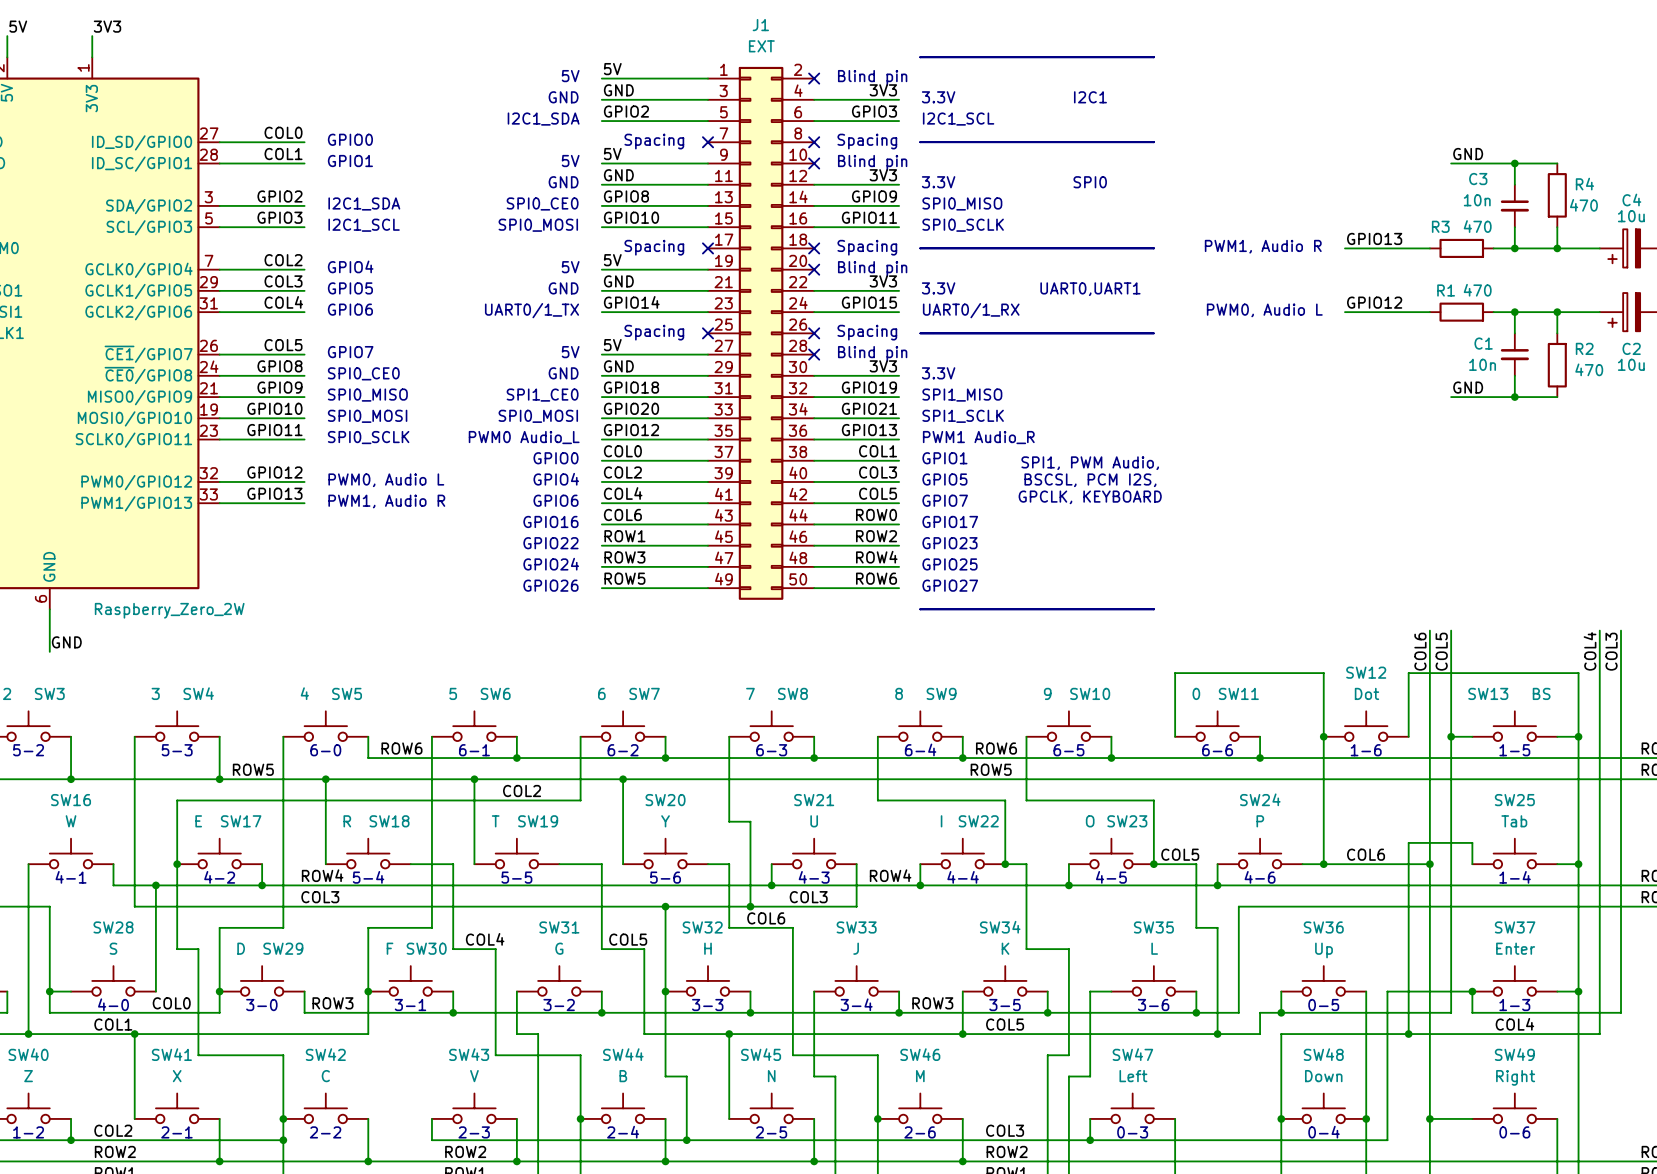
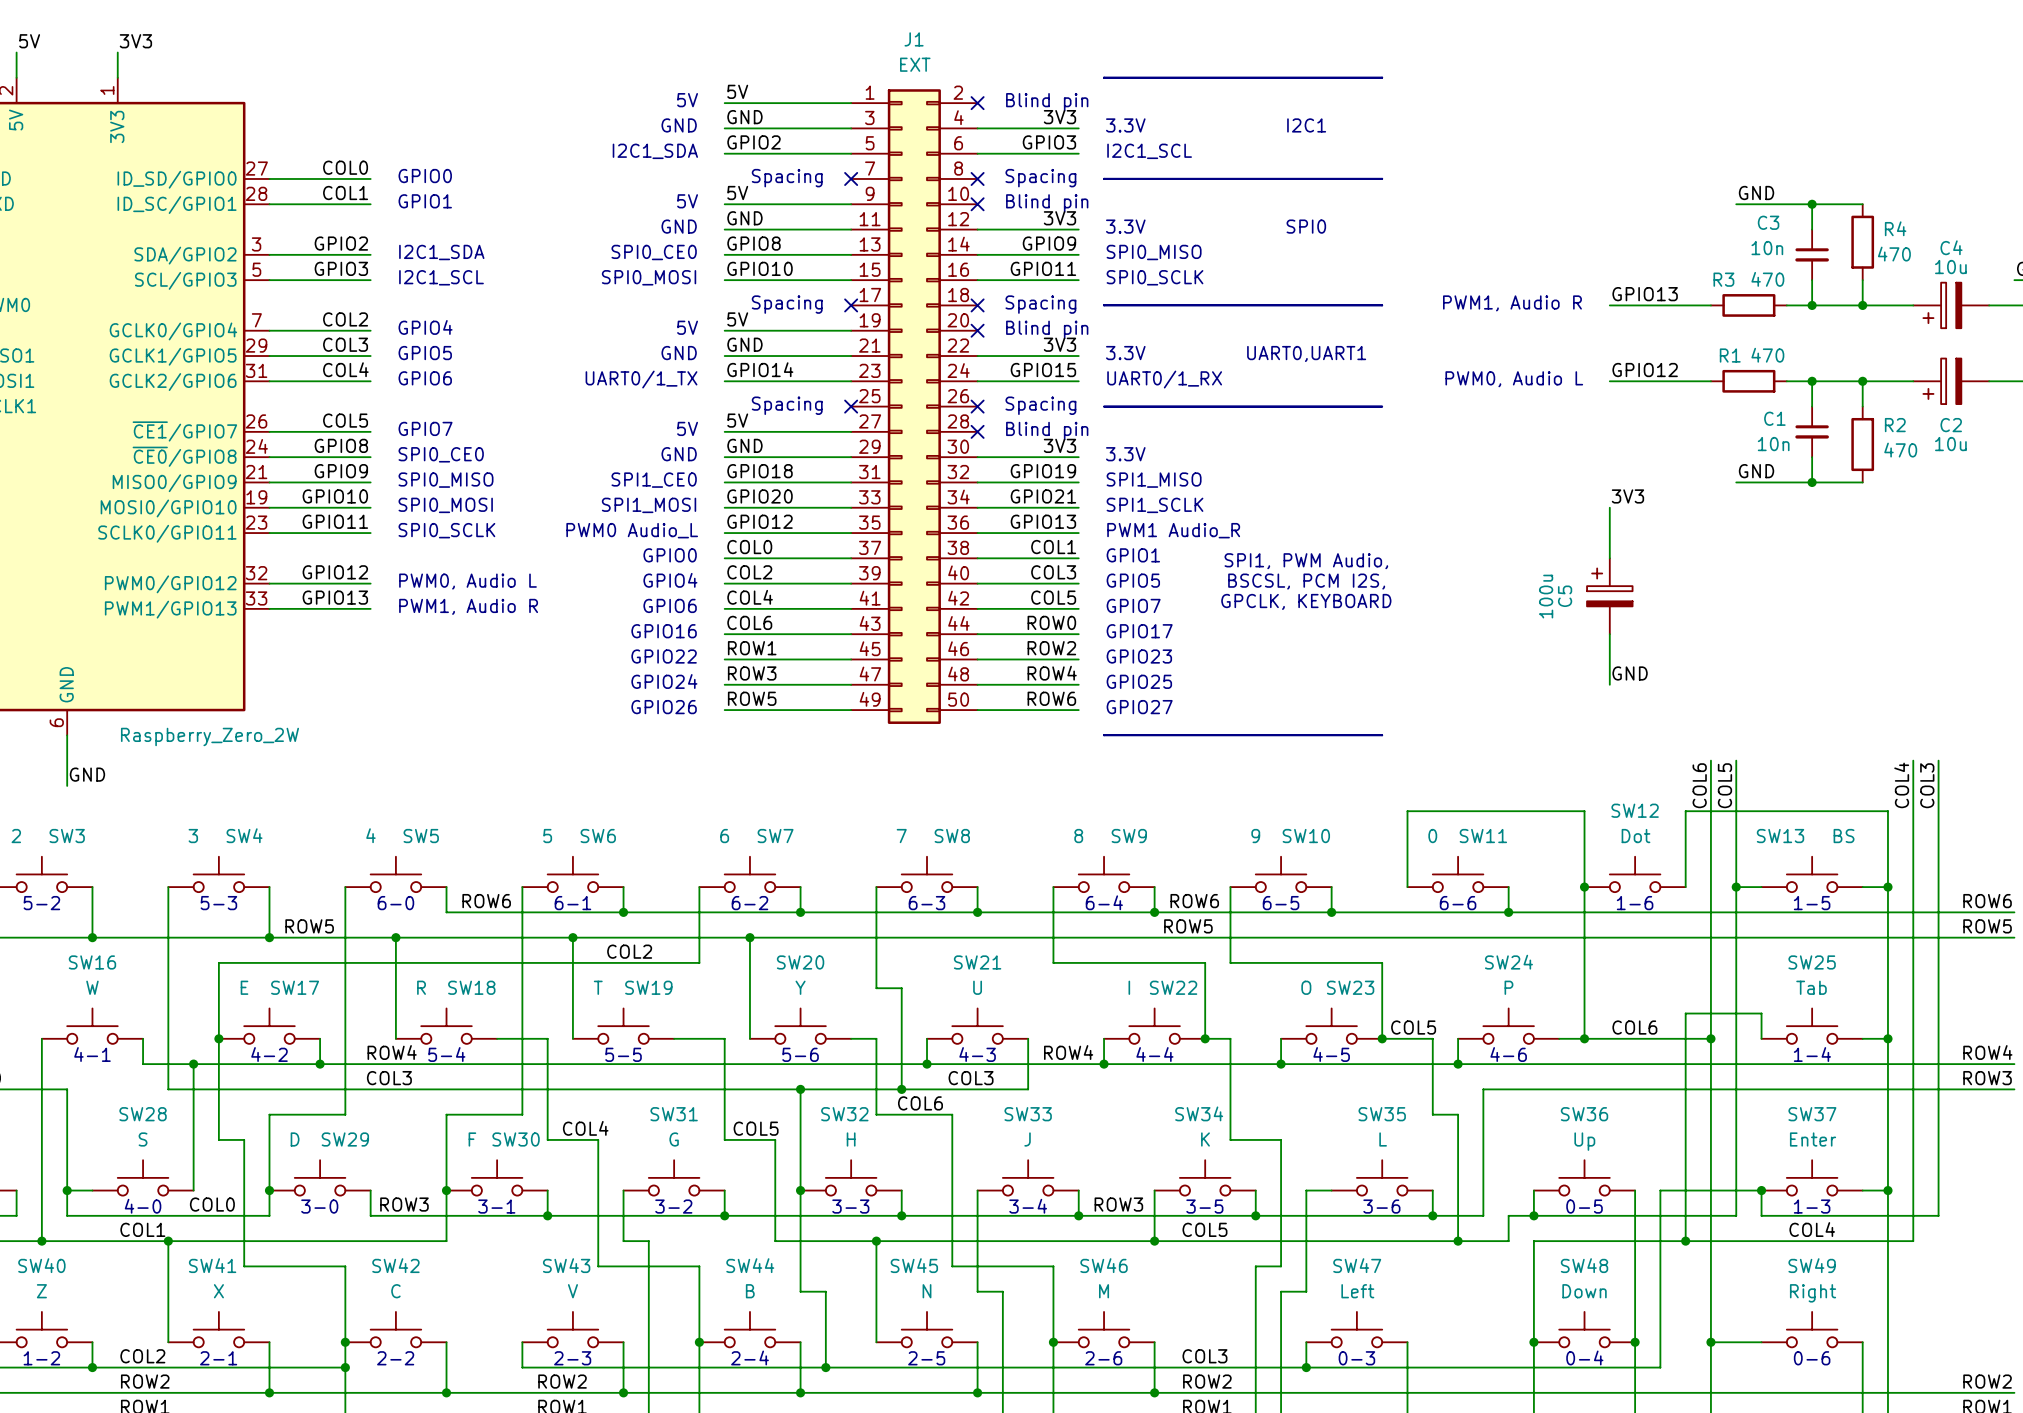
label: none -> 3V3 (1627, 496)
text: SPI0_MOSI (538, 416) -> SPI1_MOSI (649, 505)
wire: none -> (1609, 507) (1609, 558)
C5: none -> 100u (1609, 596)
wire: none -> (1609, 634) (1609, 684)
label: none -> GND (1630, 673)

